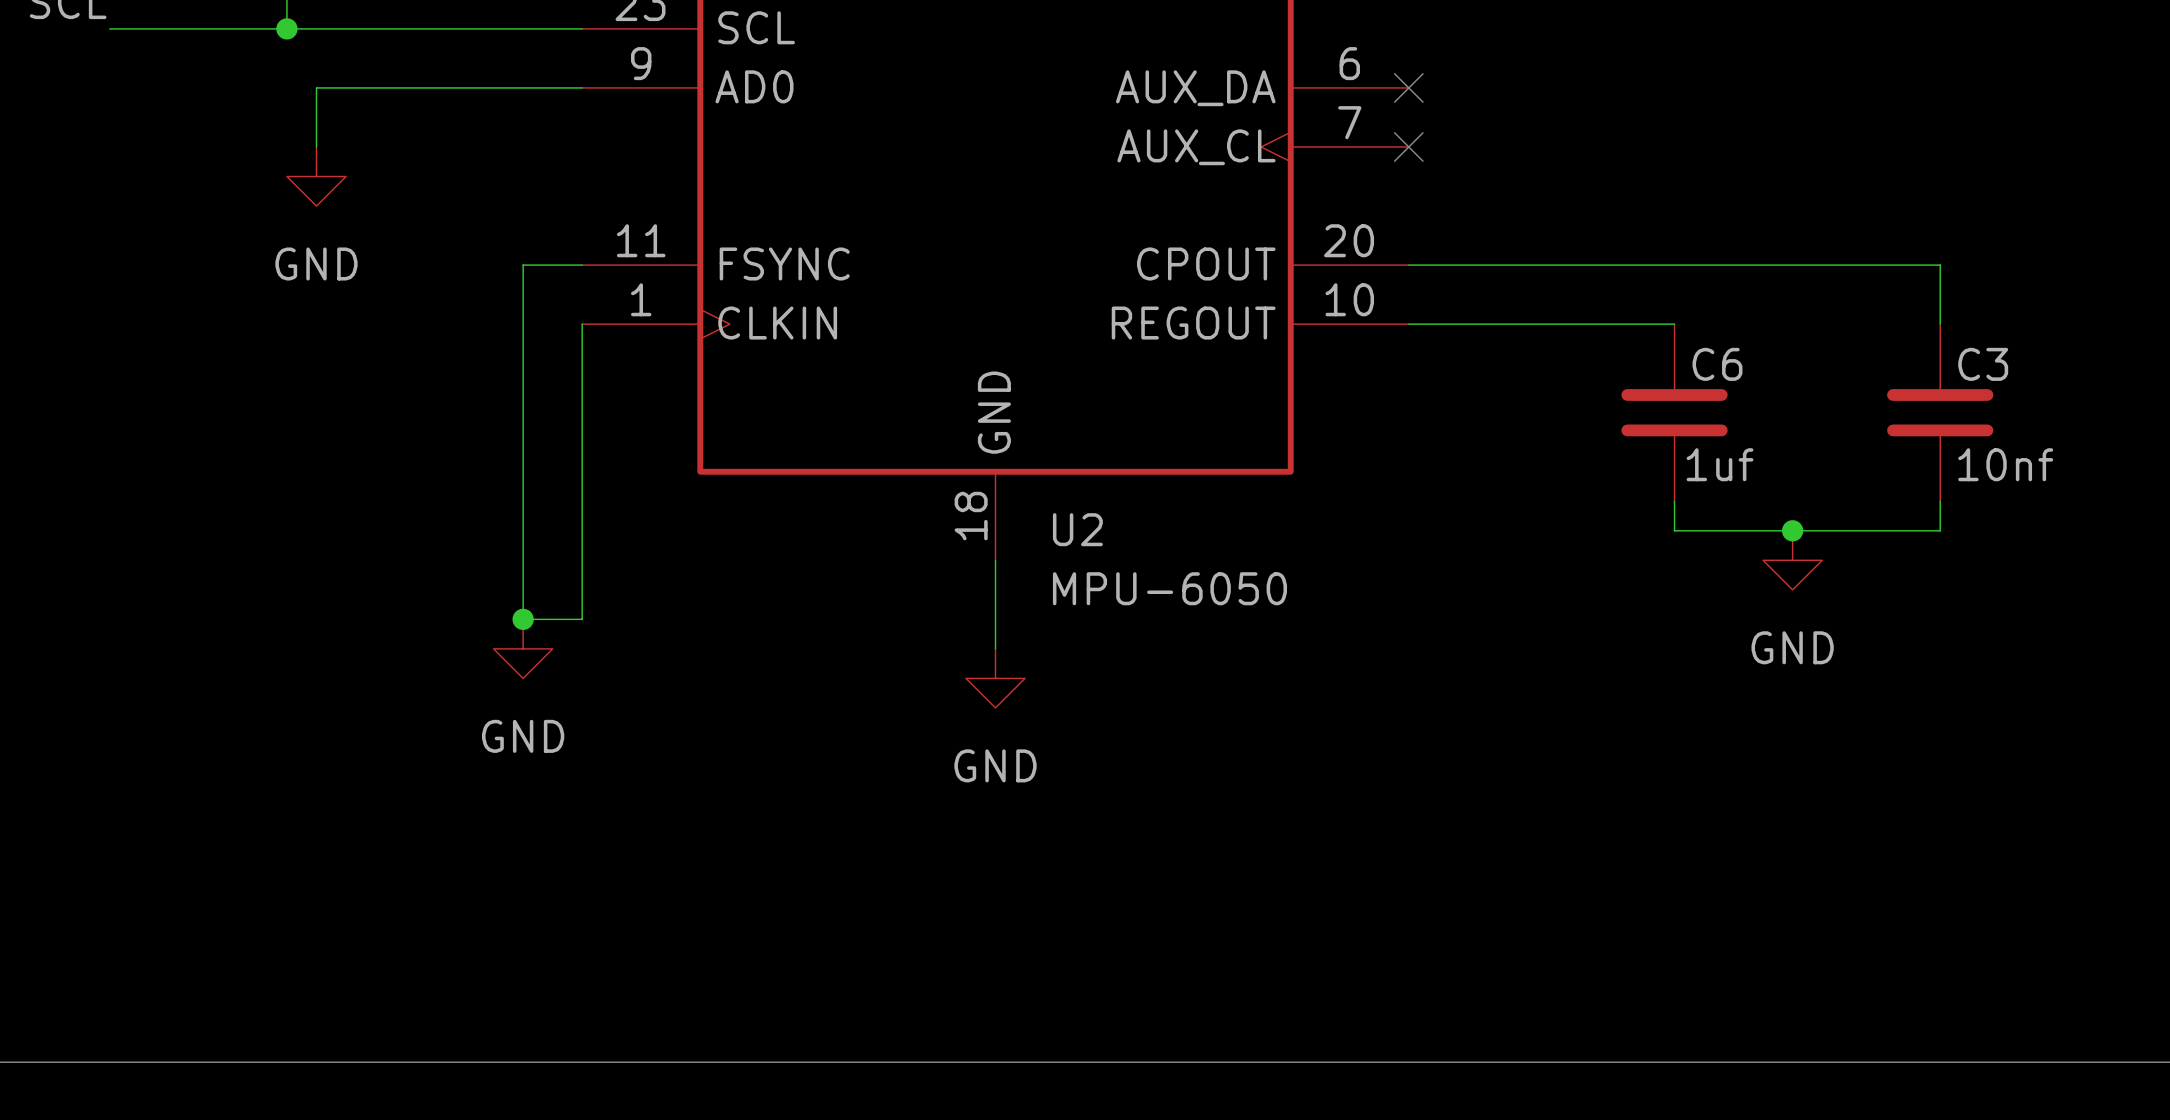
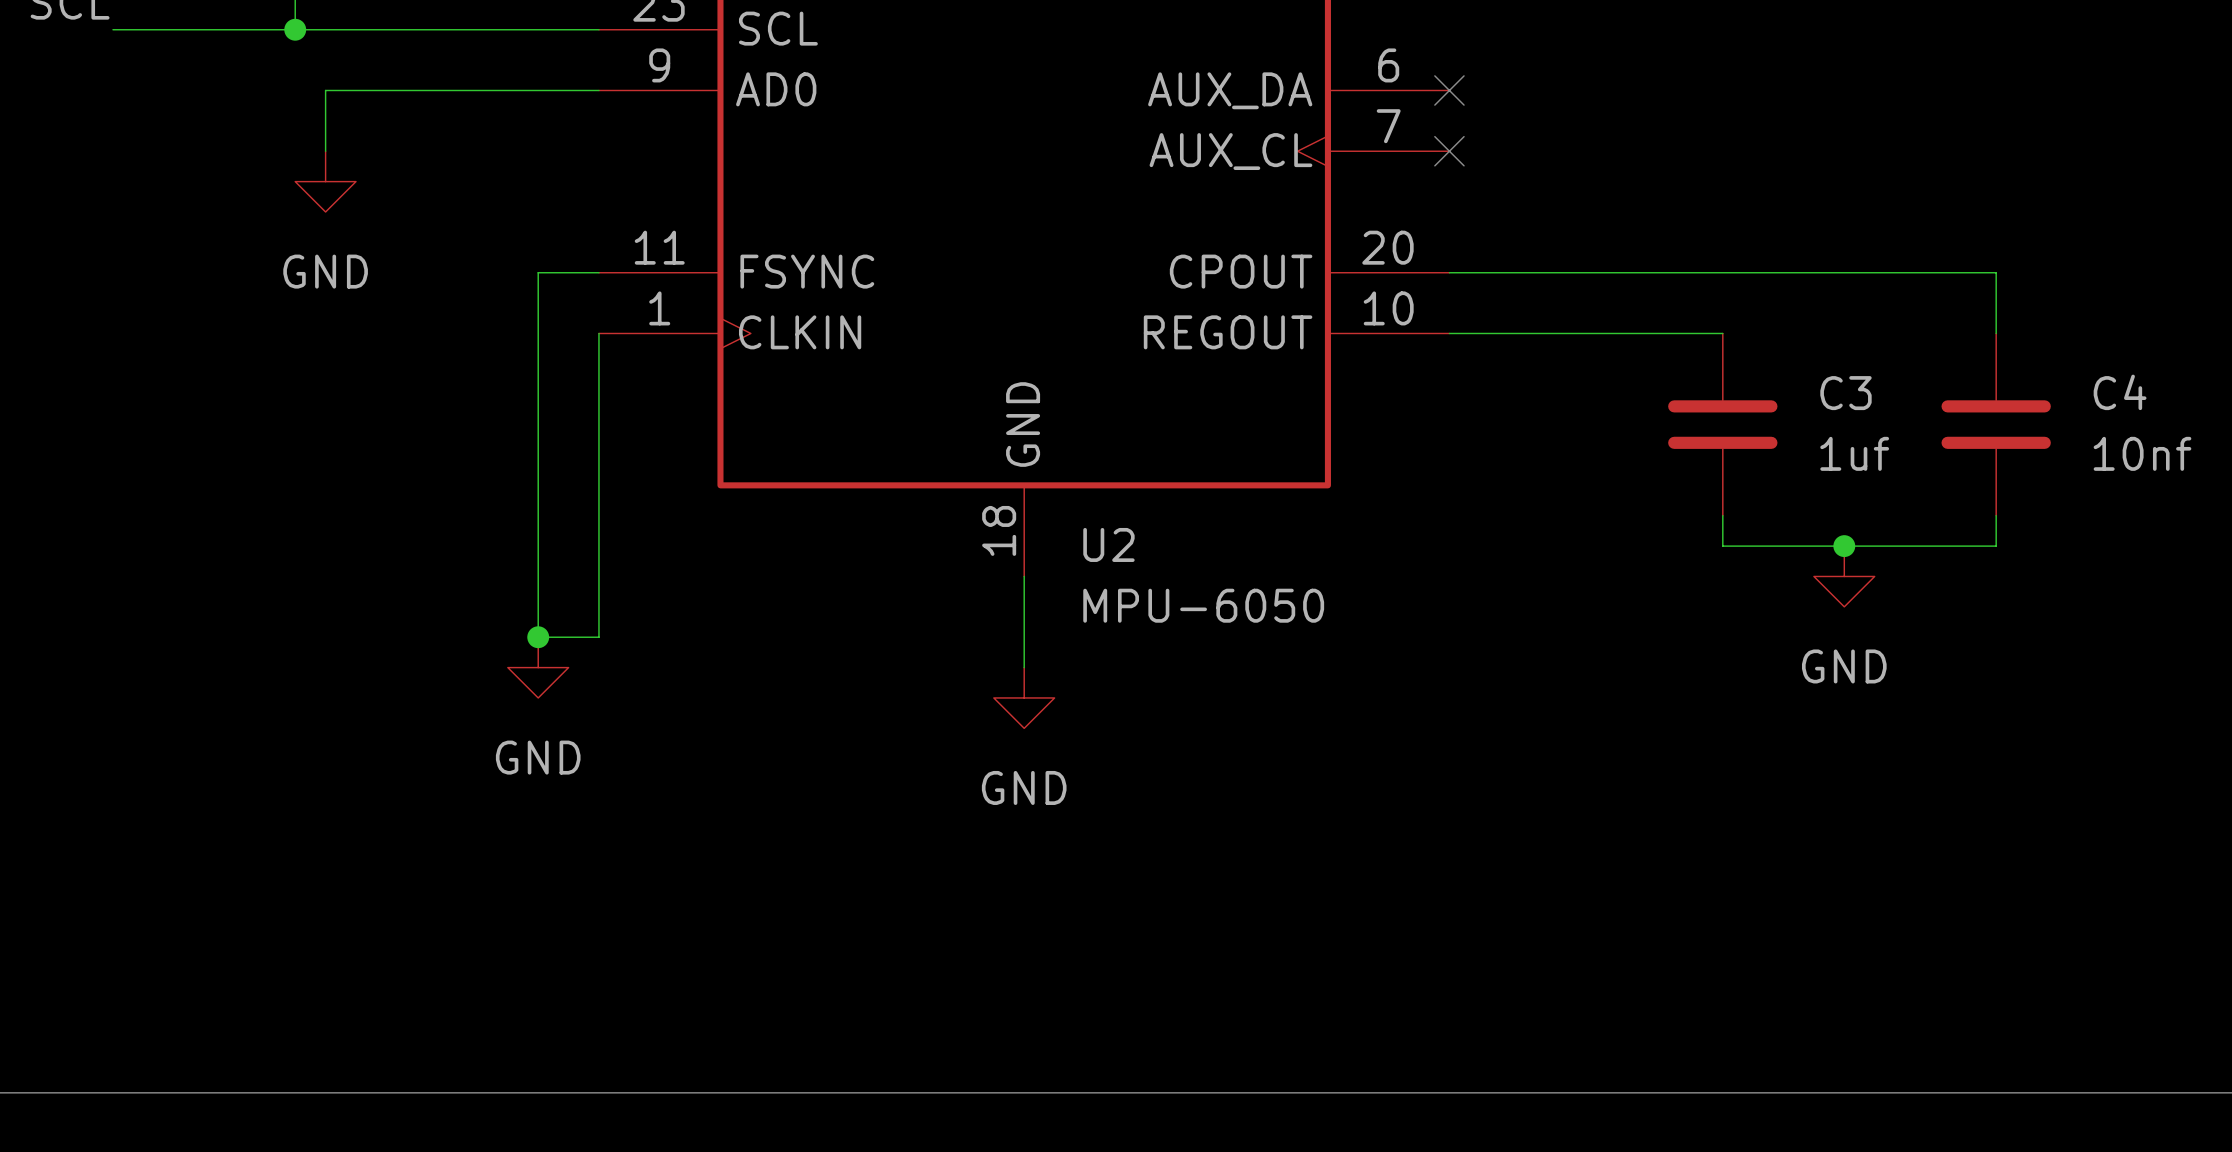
C6 name: C6 (1717, 364) -> C3 (1845, 393)
C3 name: C3 (1983, 364) -> C4 (2120, 392)
C6 value position: 1uf (1720, 464) -> 1uf (1854, 453)
C3 value position: 10nf (2005, 464) -> 10nf (2142, 453)

